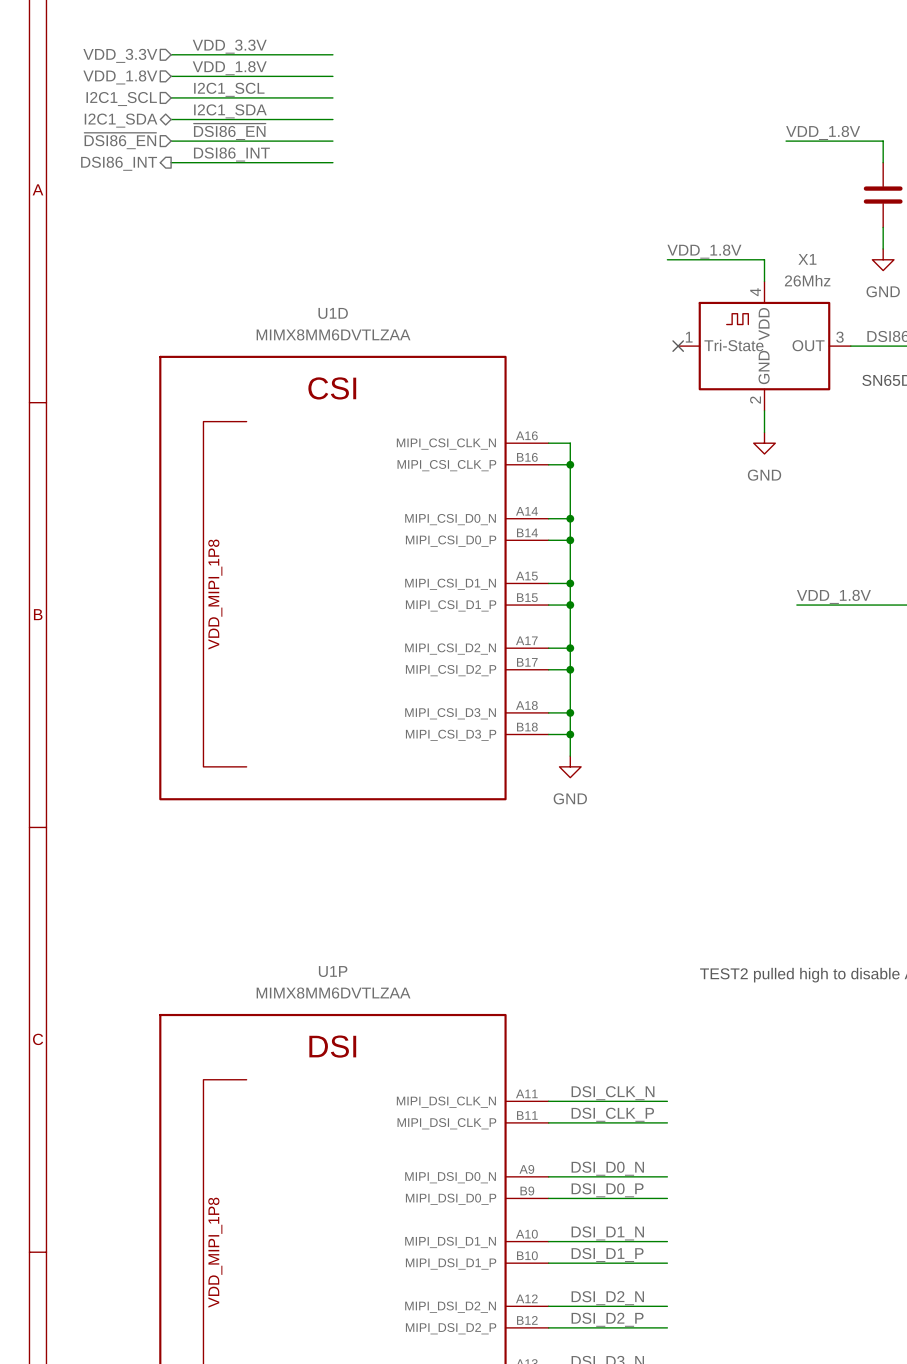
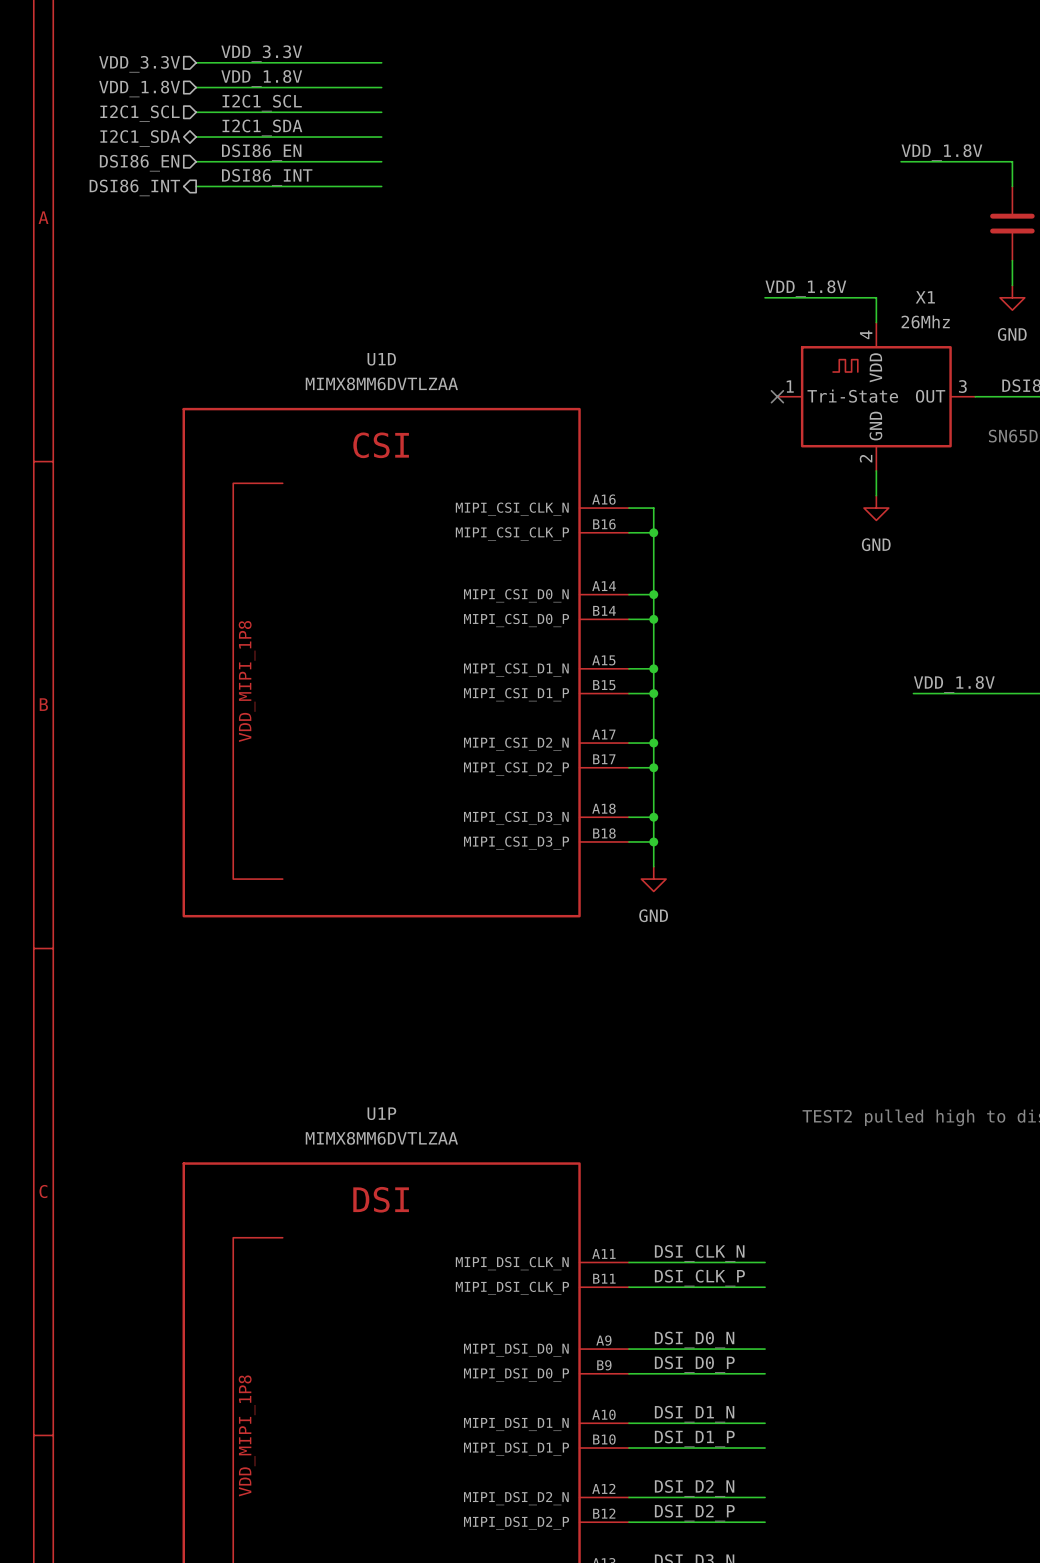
label: ~{DSI86_EN} (229, 131) -> DSI86_EN (261, 152)
hierarchical label: ~{DSI86_EN} (120, 141) -> DSI86_EN (139, 163)

